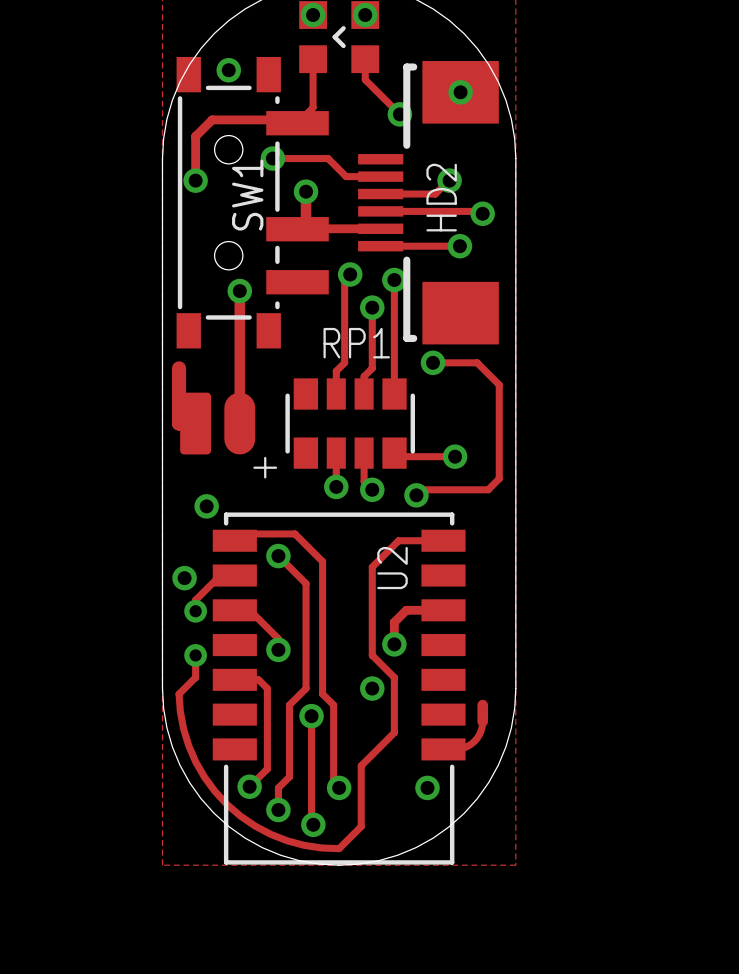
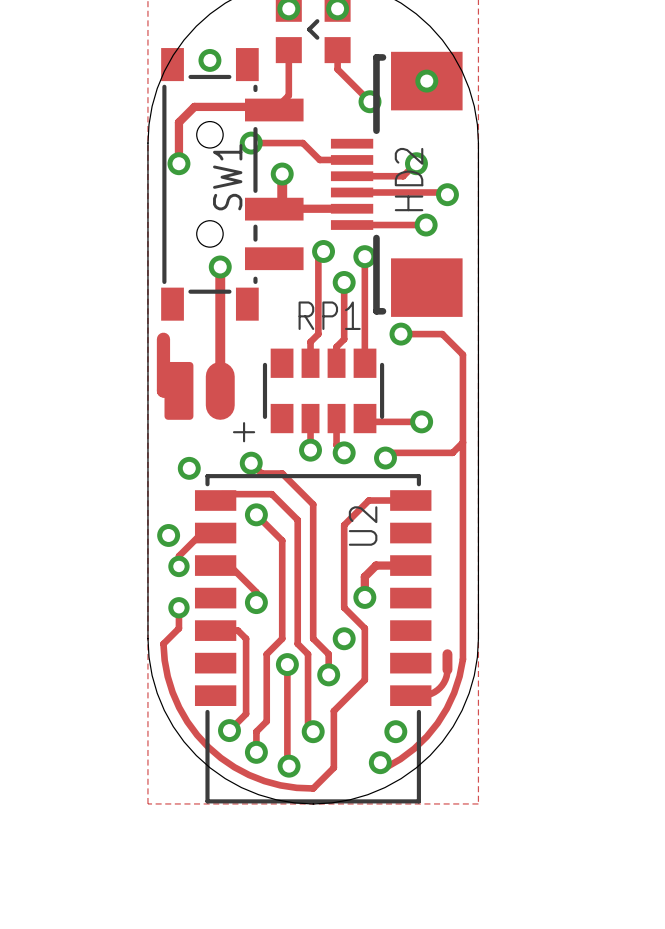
track: none -> (462, 442) (462, 659) (459, 676) (446, 708) (426, 736) (414, 748) (385, 767) (380, 762)
track: none -> (251, 463) (261, 473) (282, 473) (313, 504) (313, 638) (328, 654) (328, 674)
via: none -> (251, 463)
via: none -> (328, 674)
via: none -> (380, 762)

